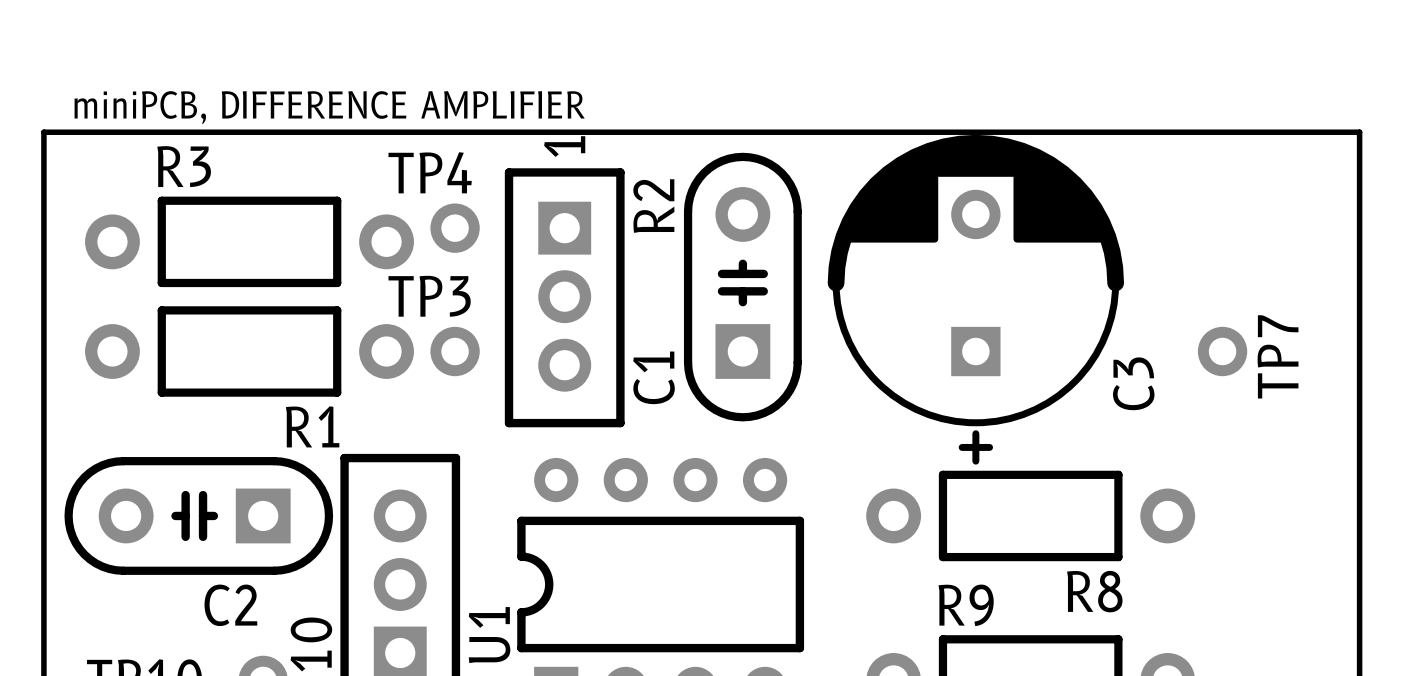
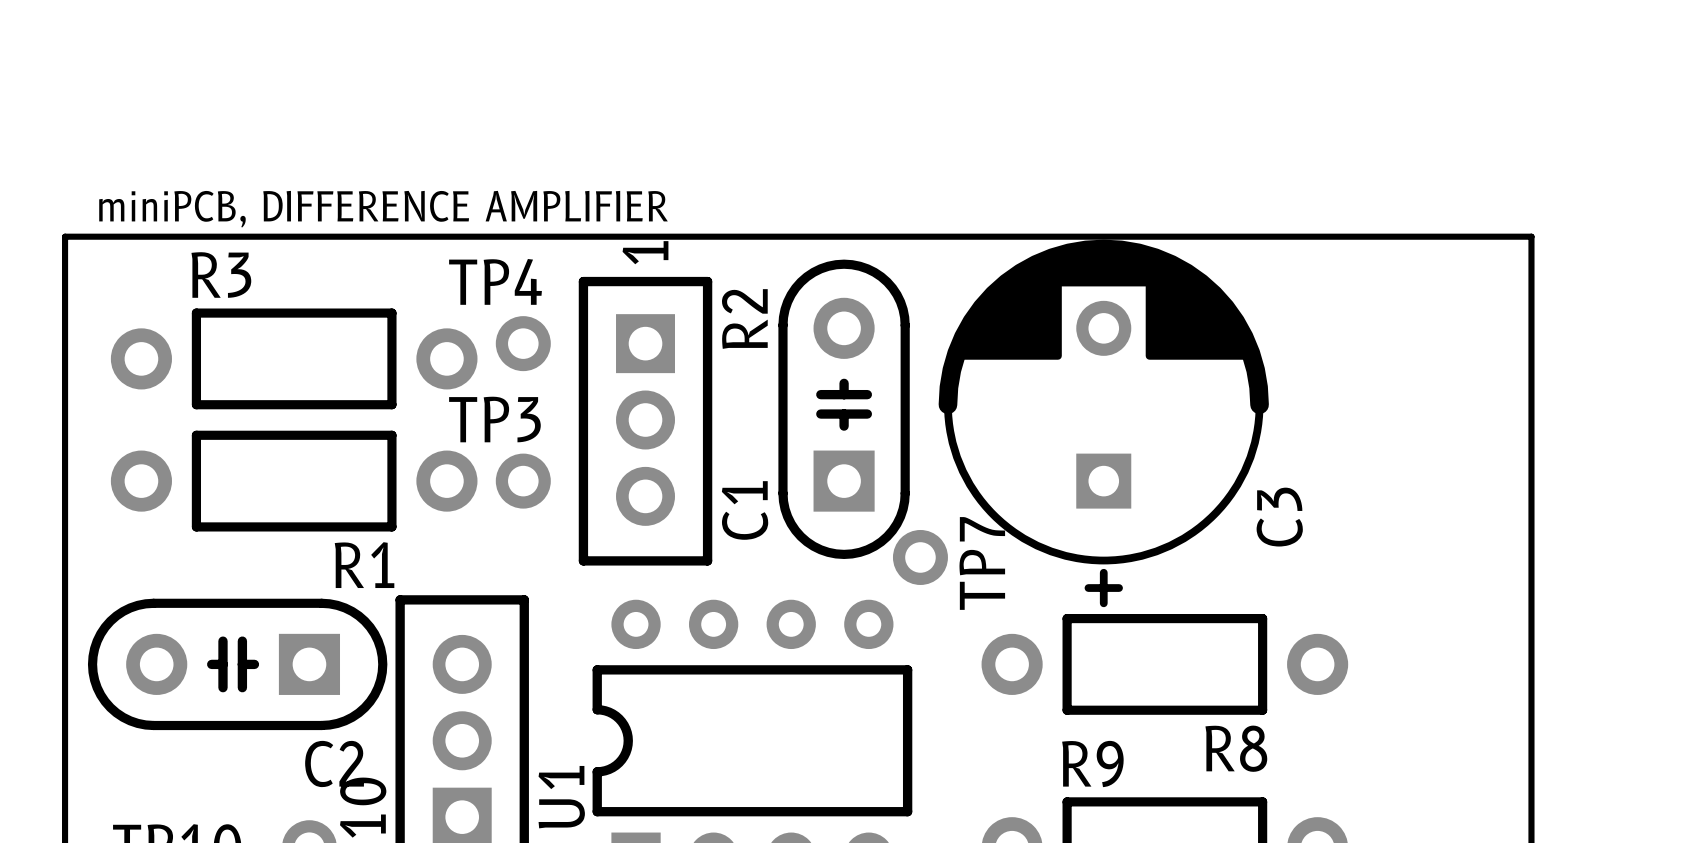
TP7 position: (1222, 351) -> (920, 557)
C2 name position: C2 (230, 605) -> C2 (334, 763)

